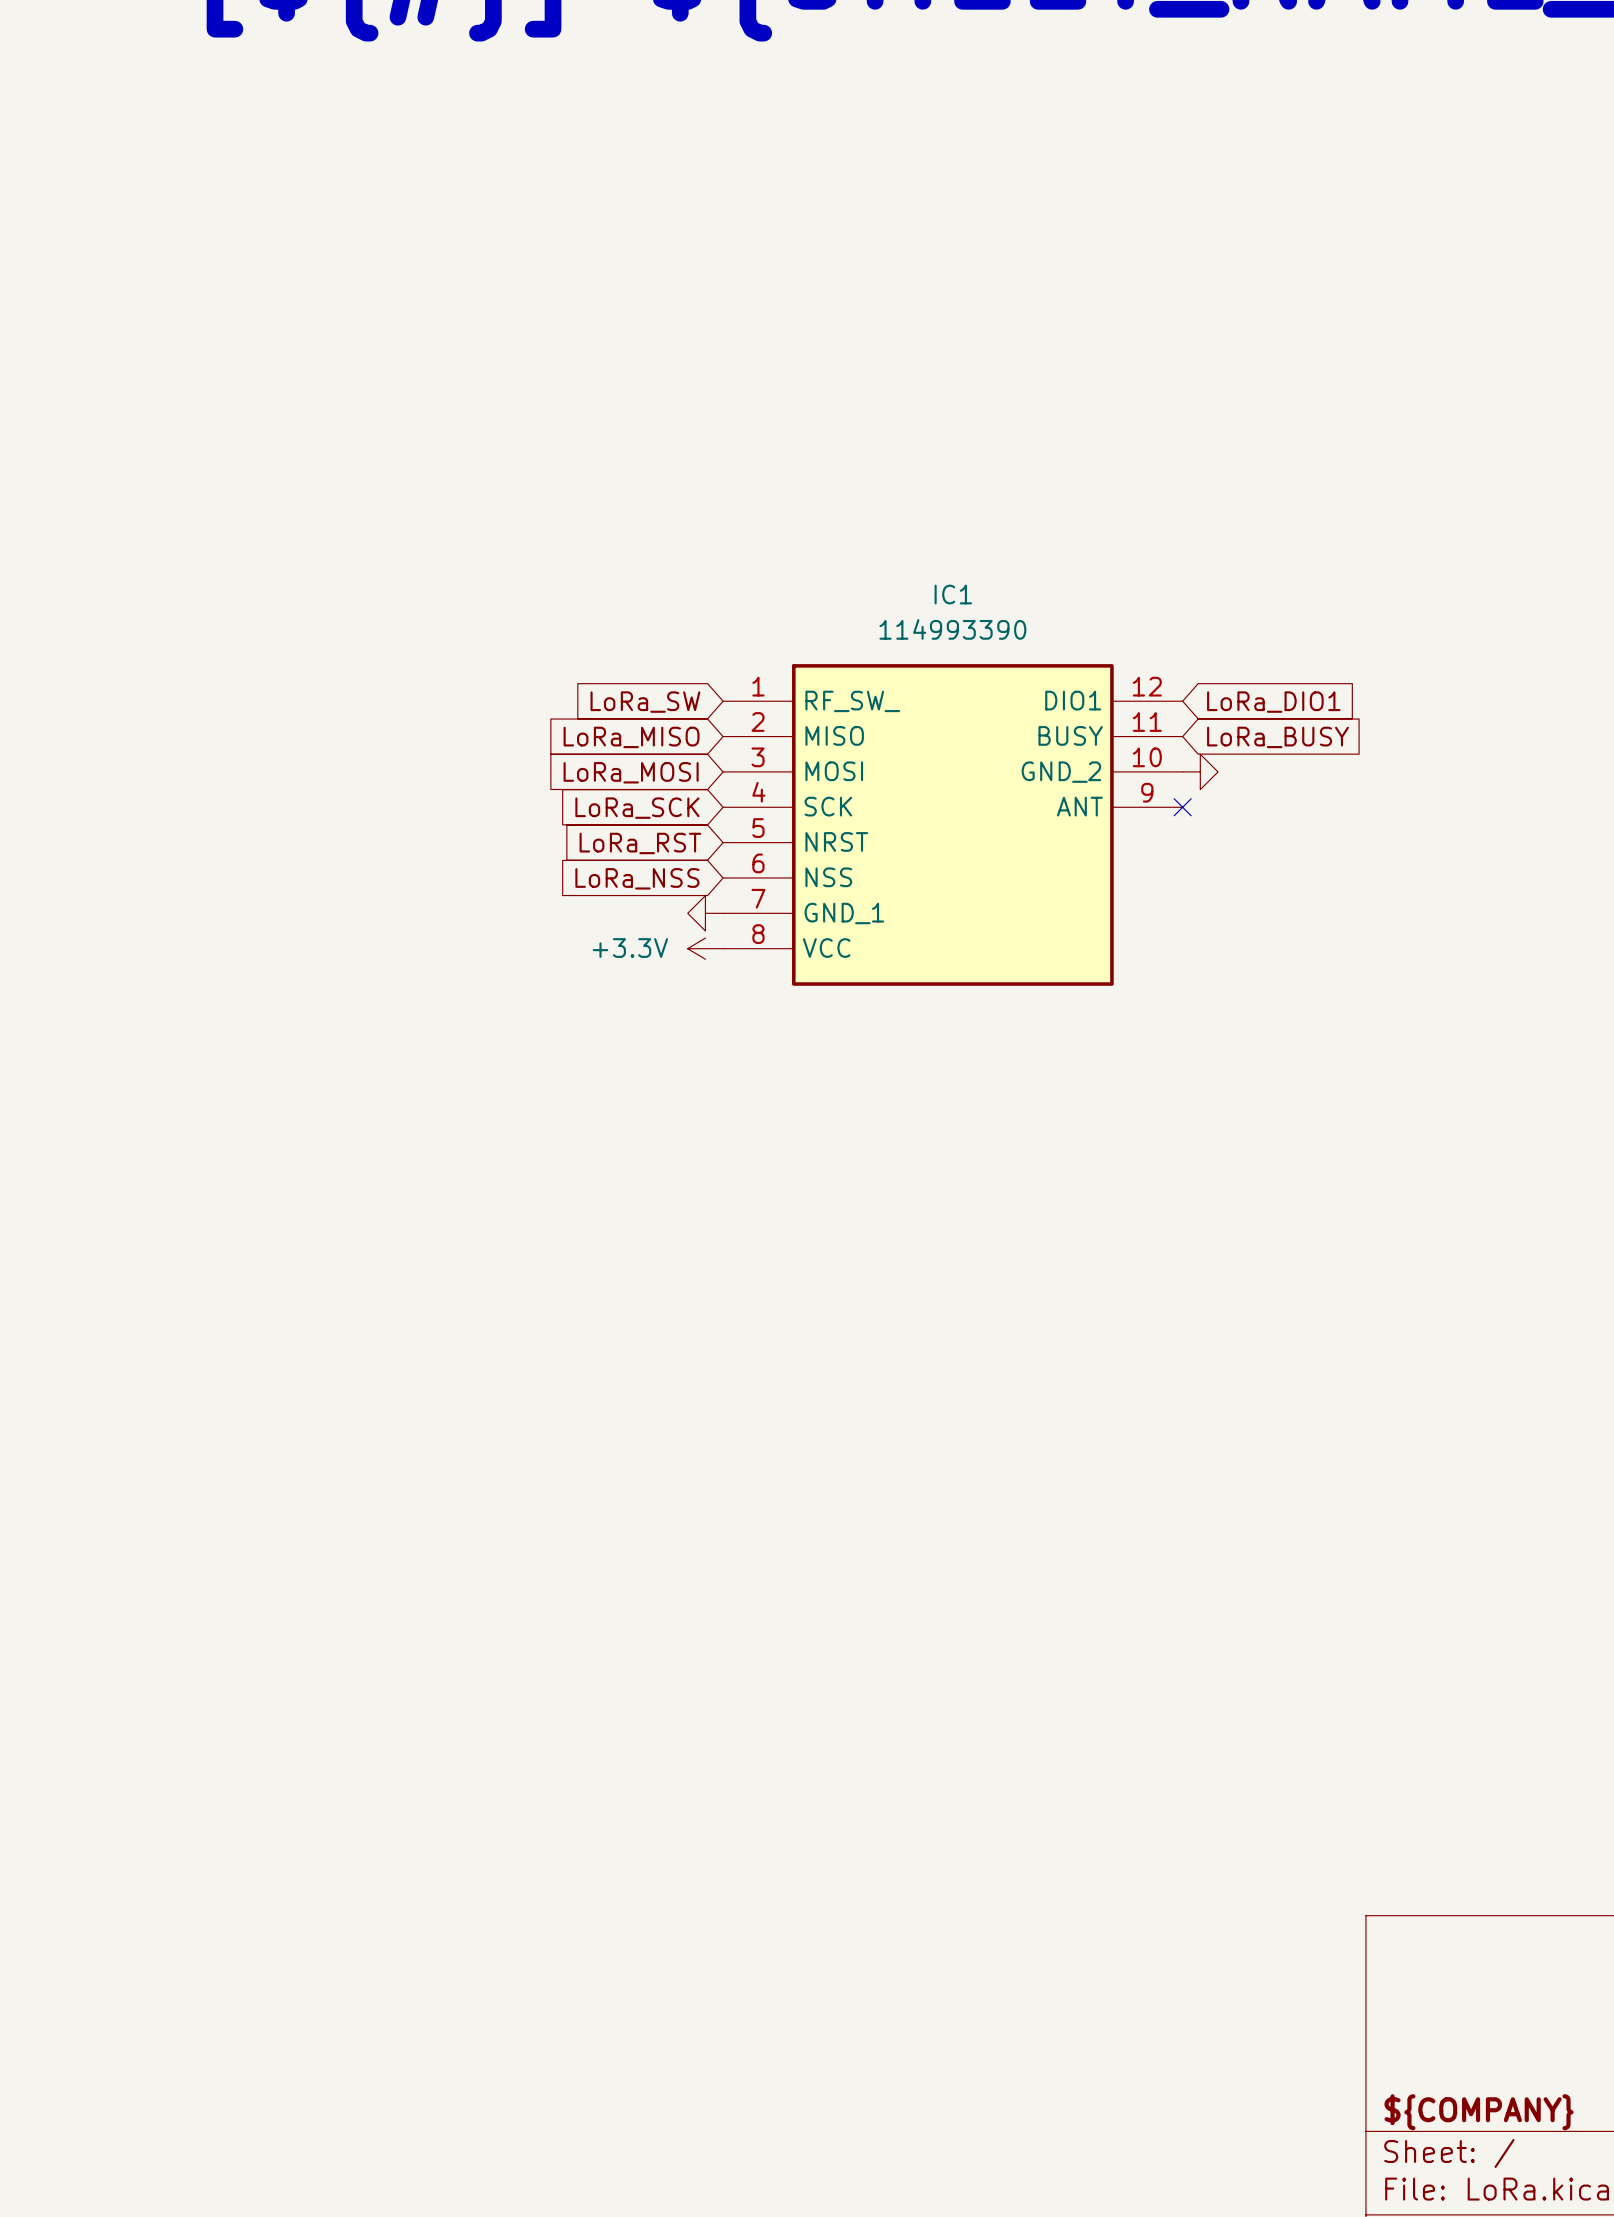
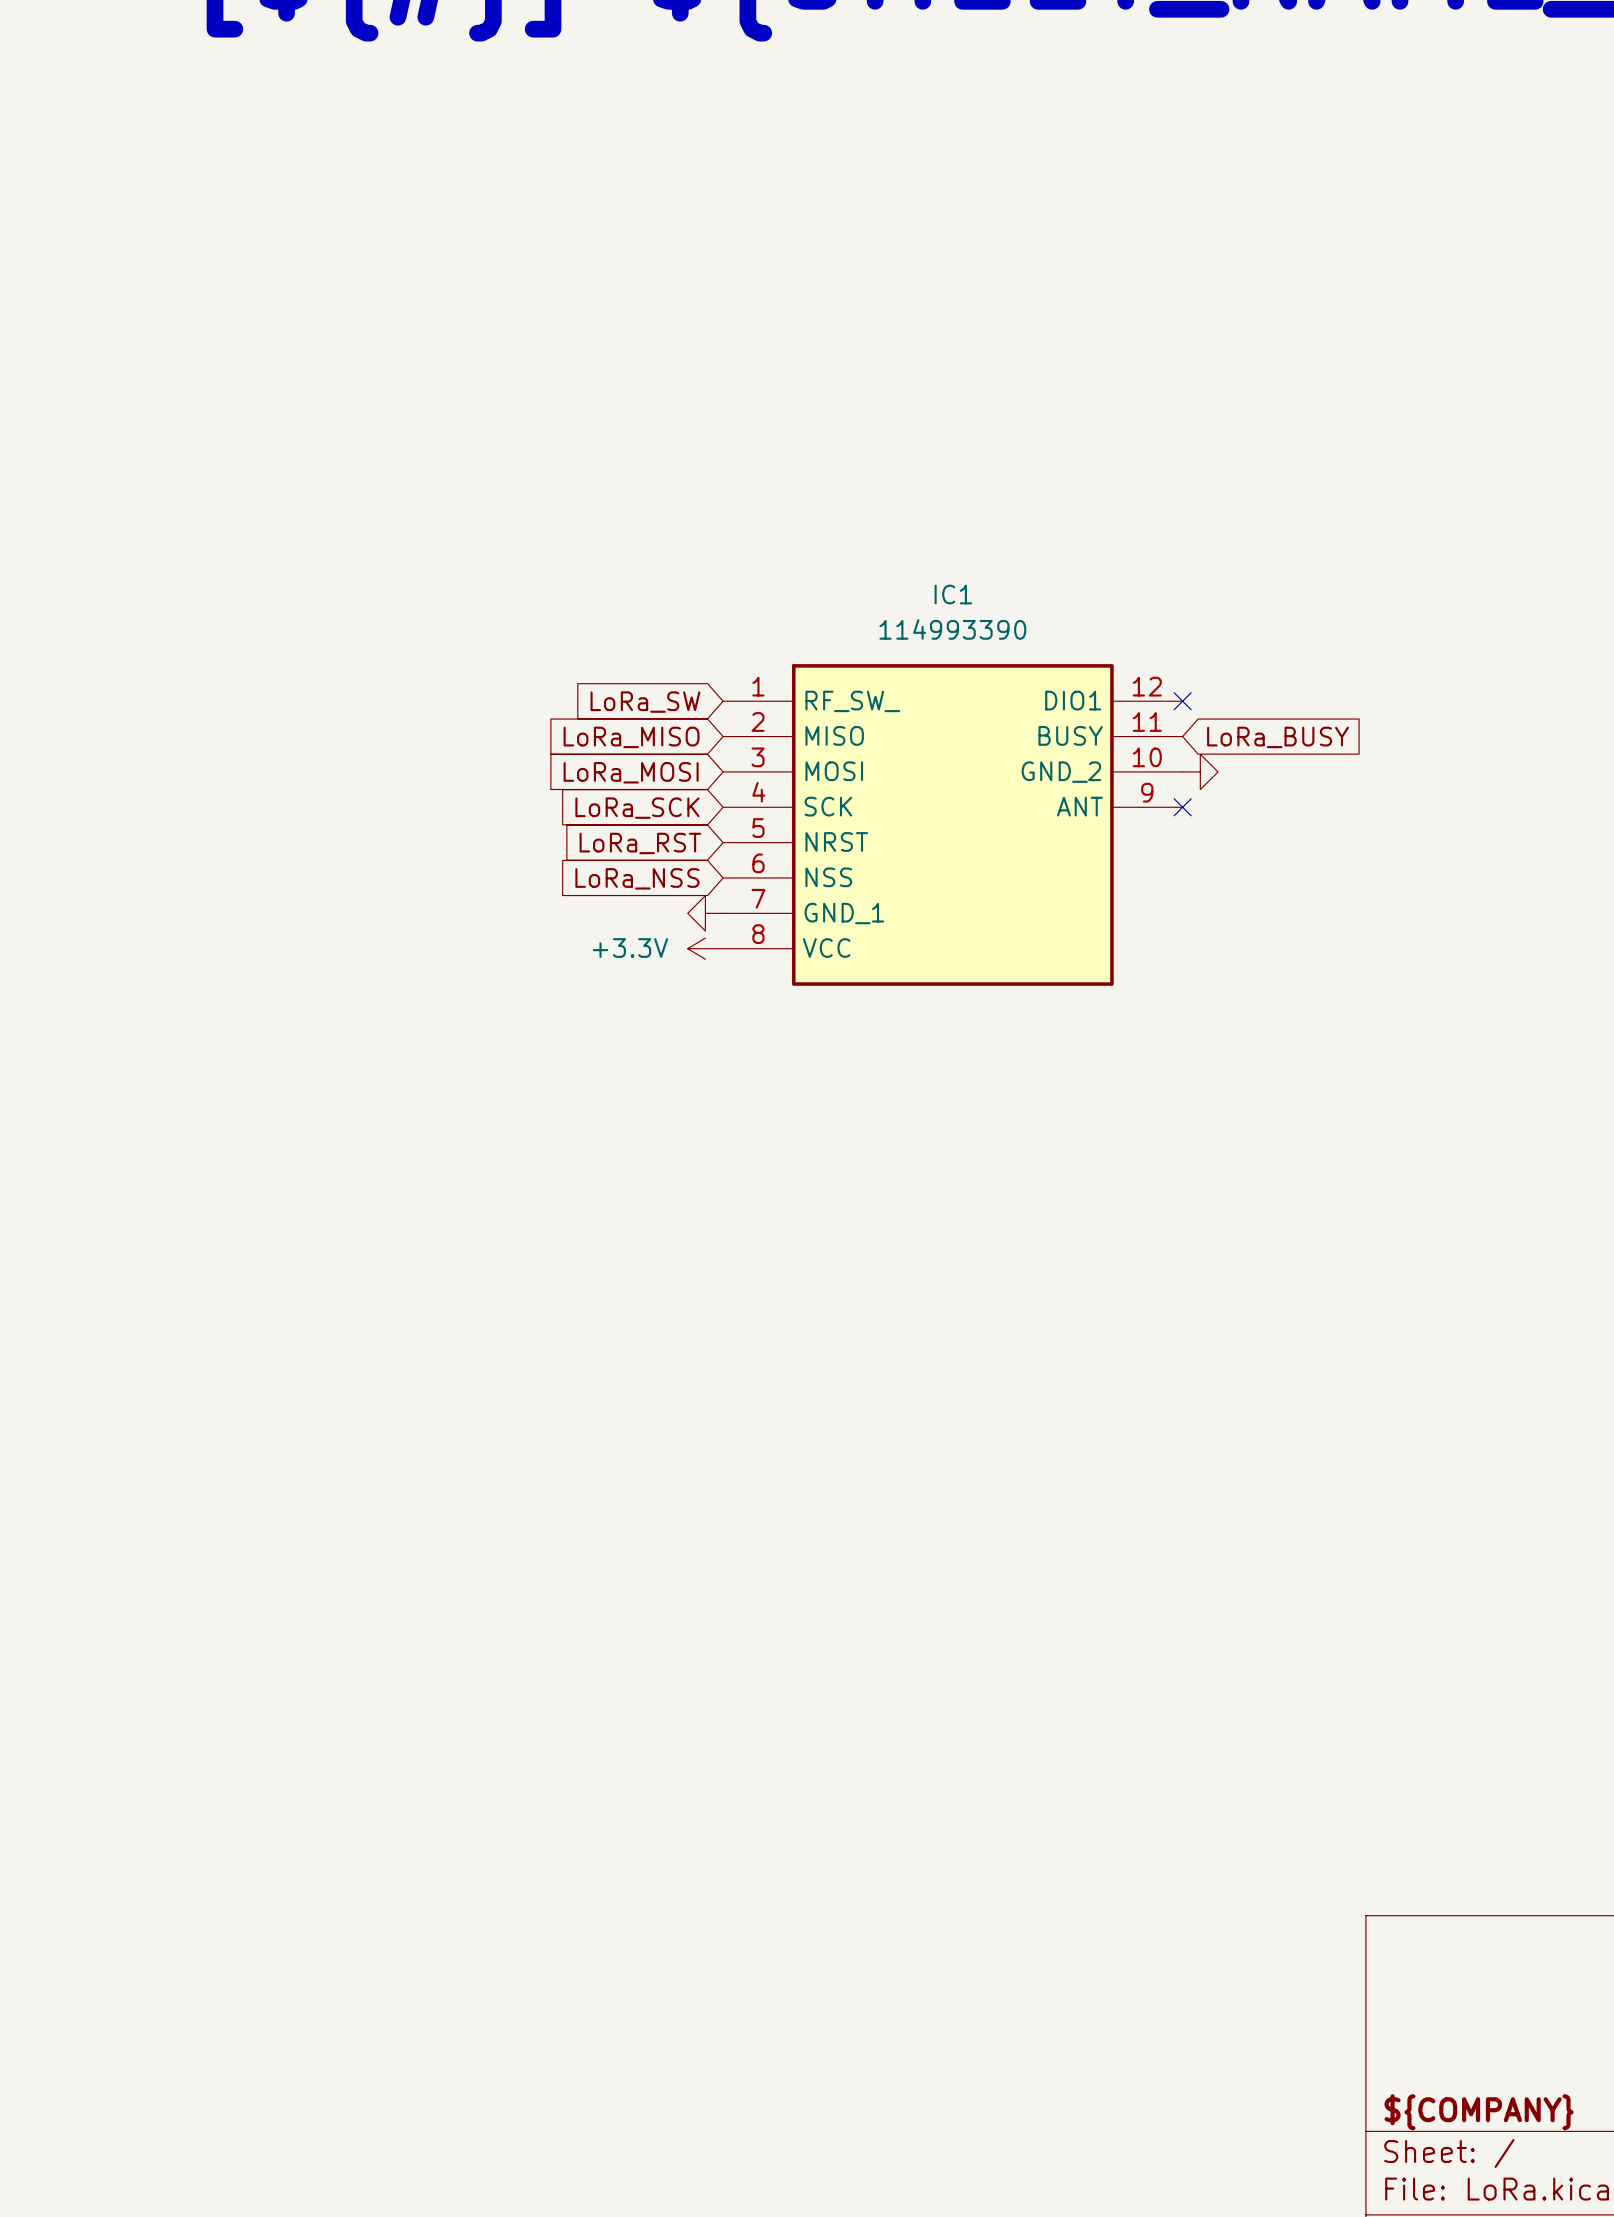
no-connect mark: none -> (1182, 701)
global label: LoRa_DIO1 (1273, 702) -> none

